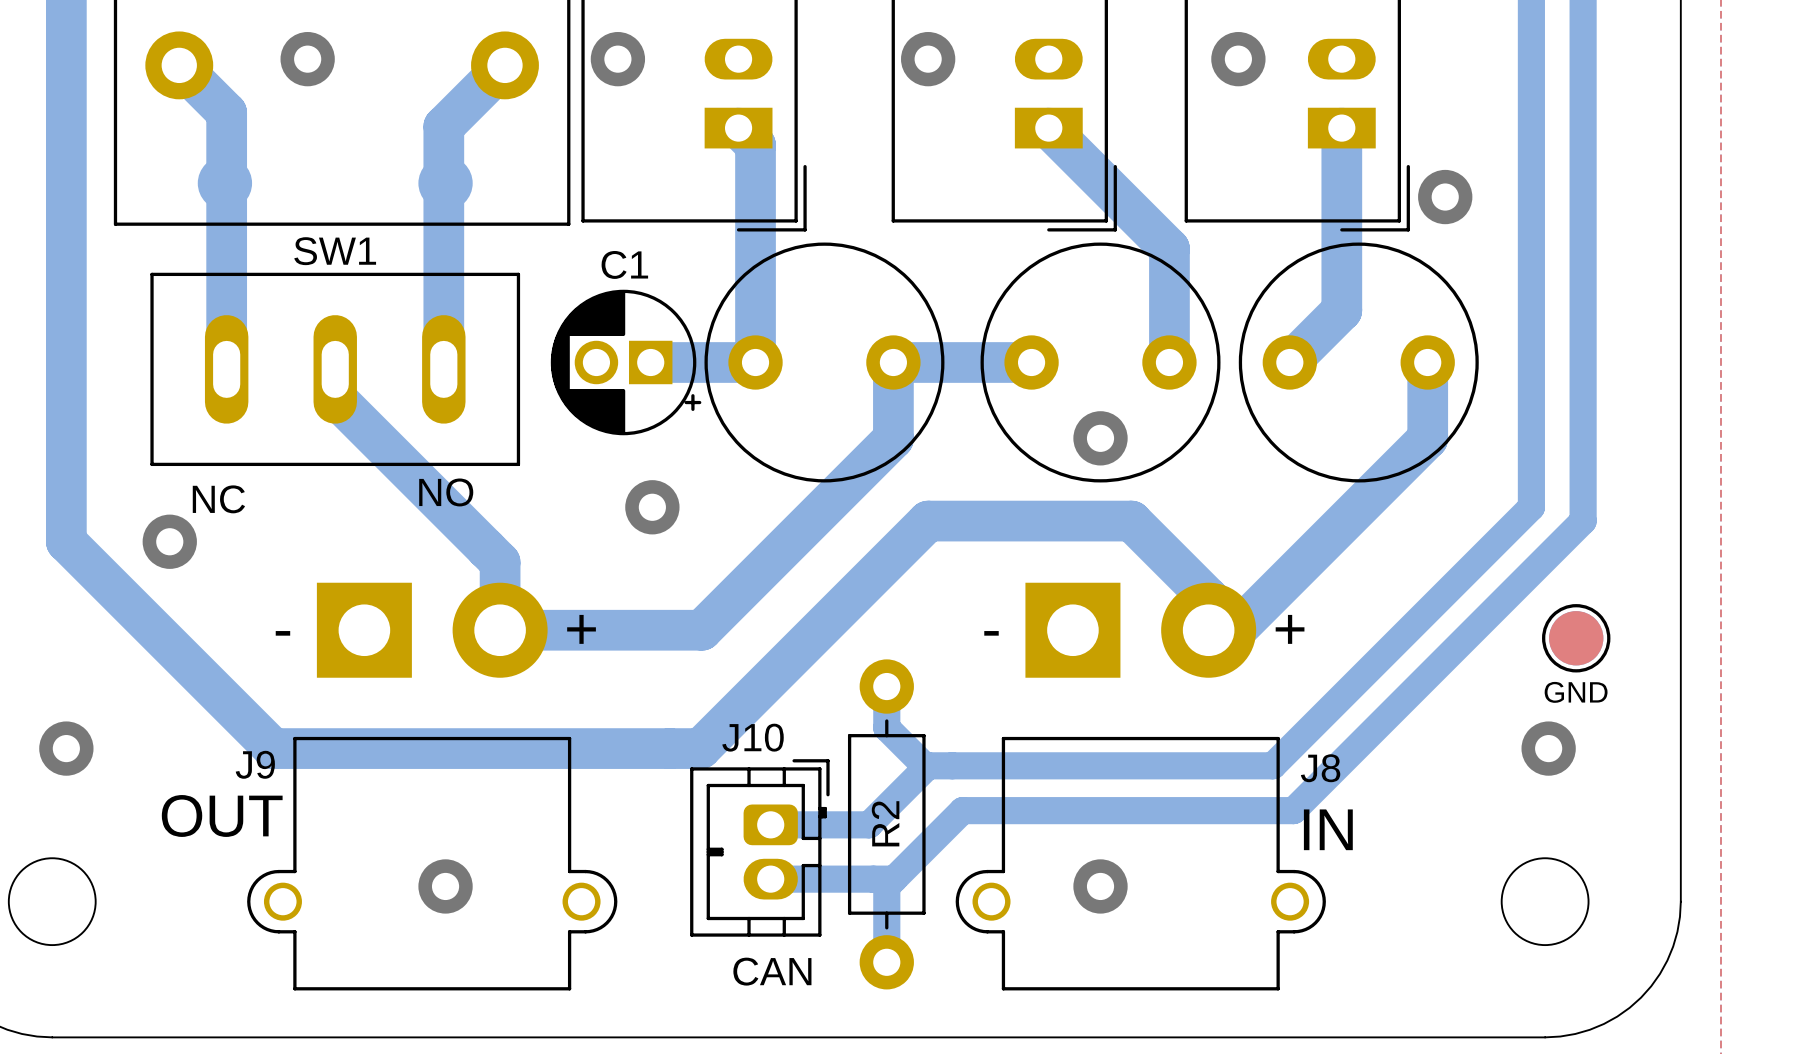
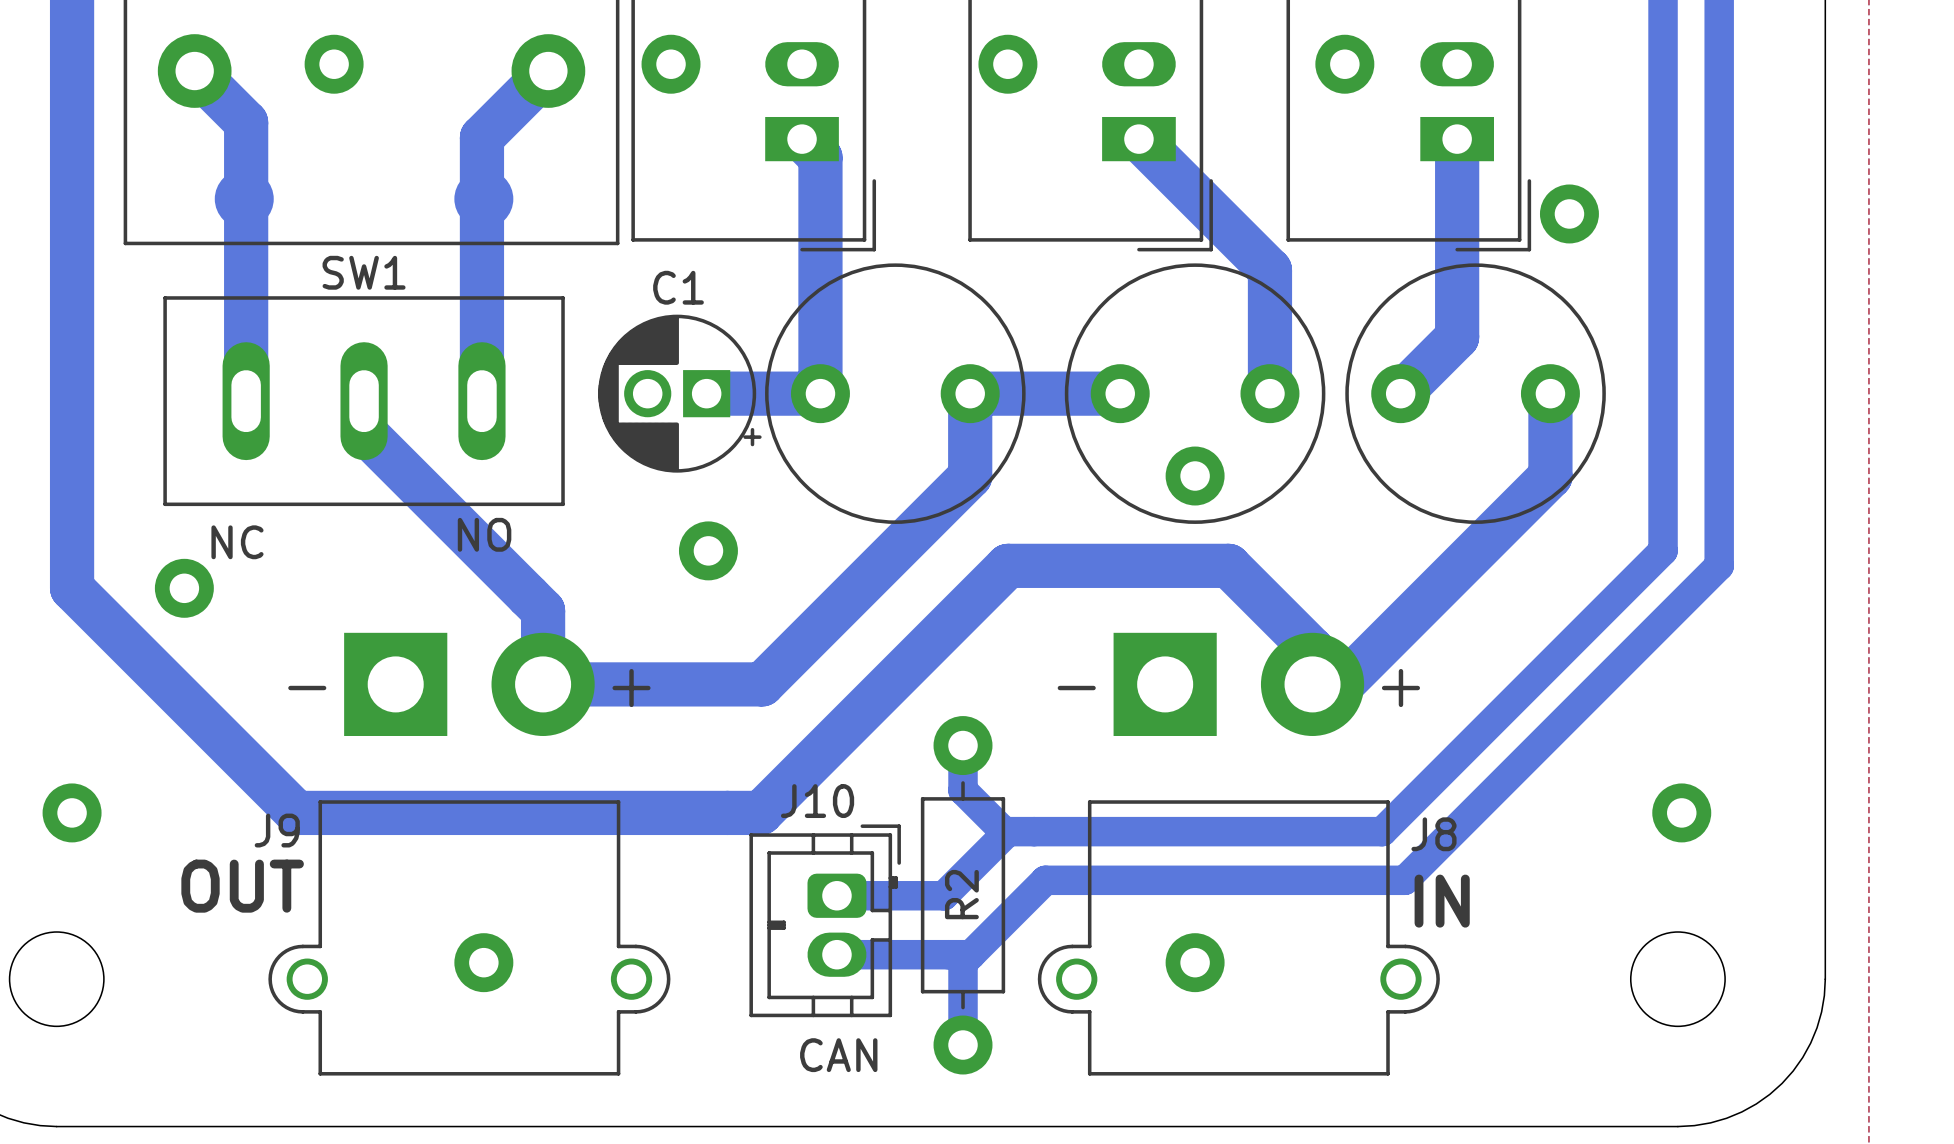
part: (1576, 638) -> none
text: GND (1576, 692) -> none

